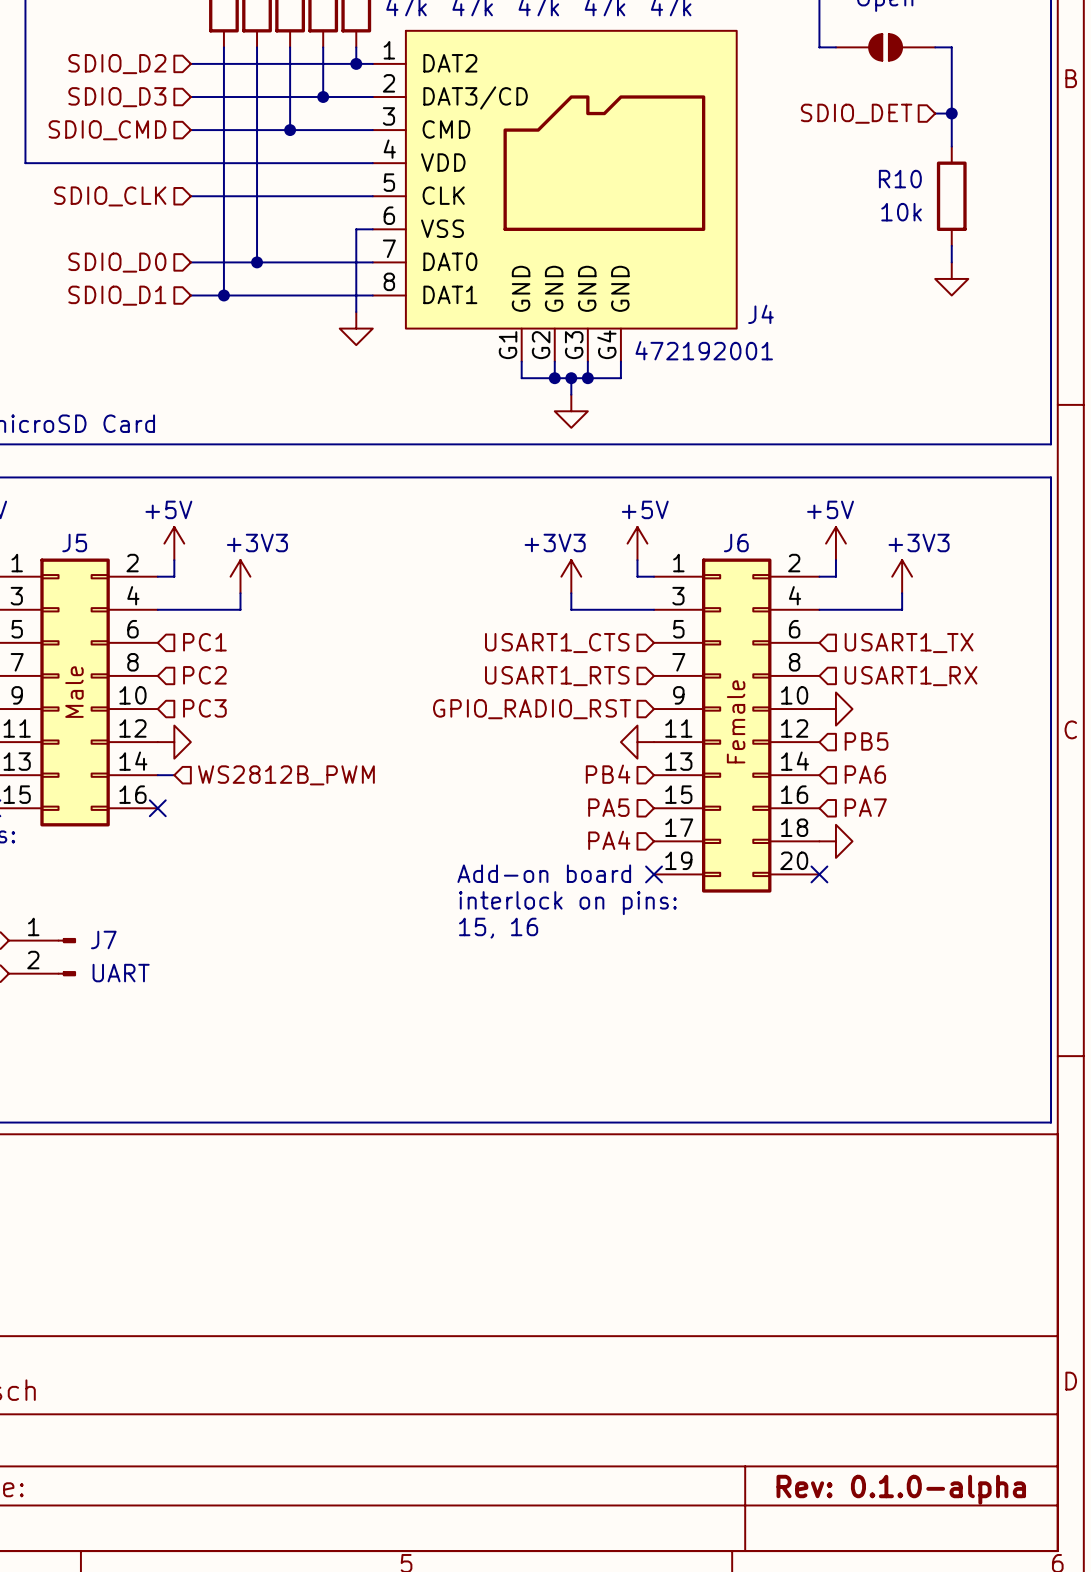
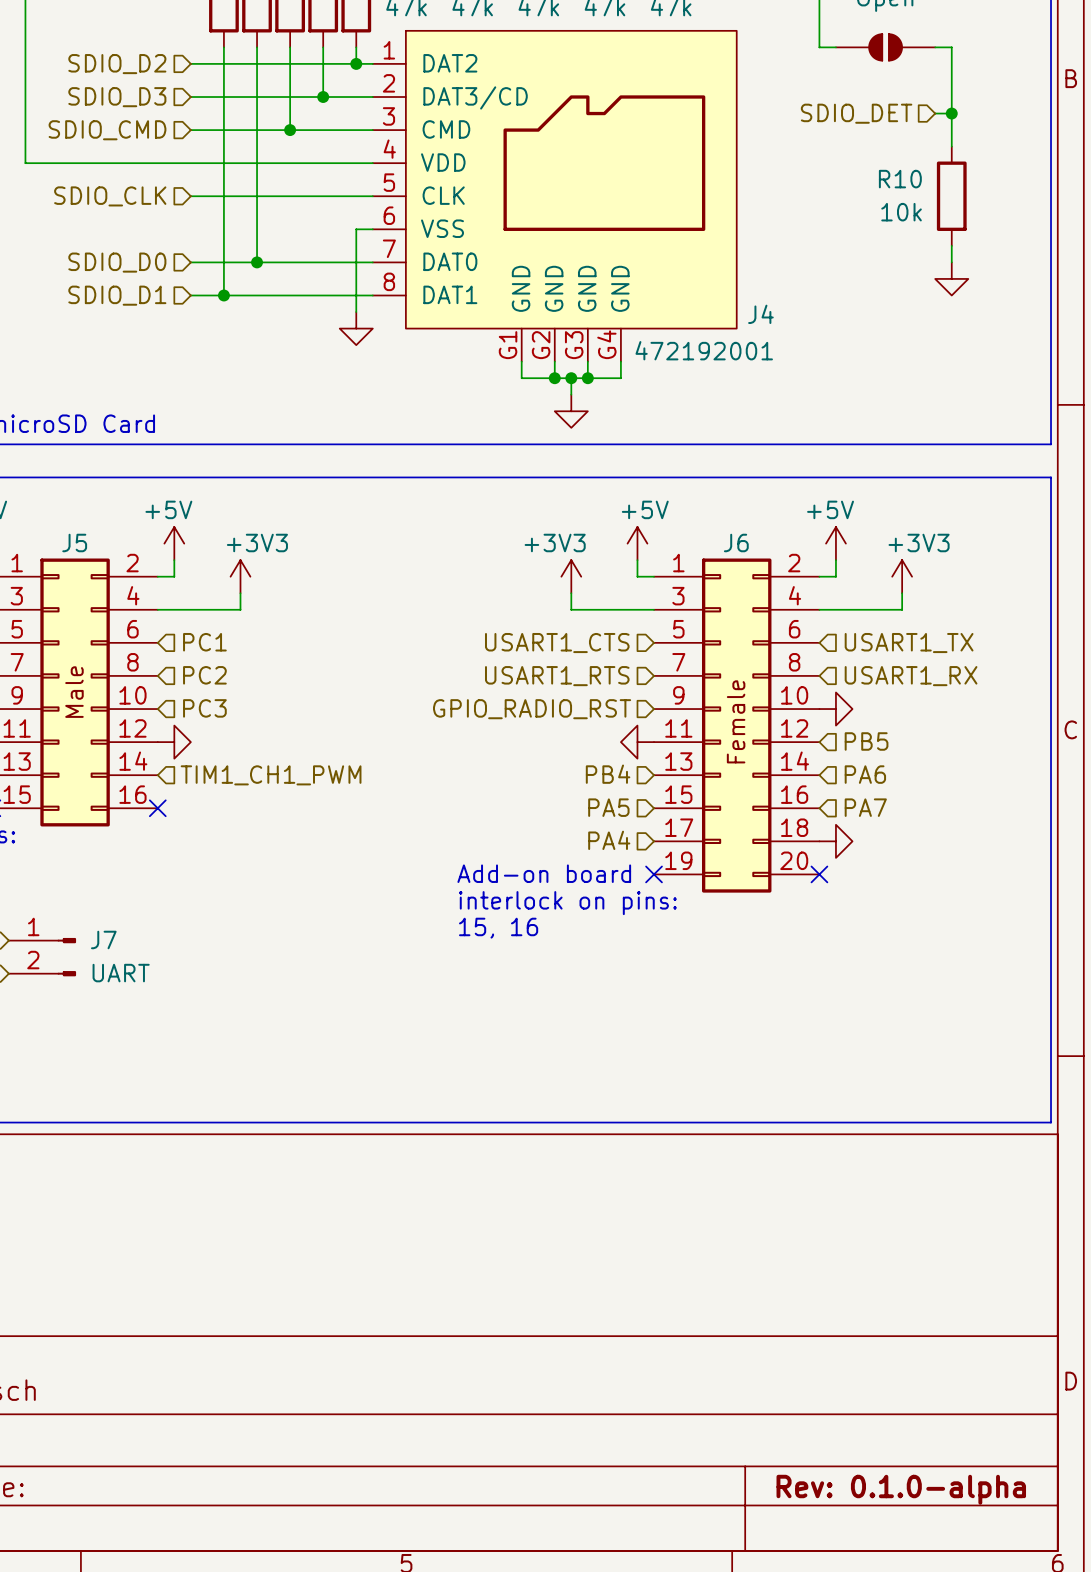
wire: (157, 775) (174, 775) -> none
hierarchical label: none -> TIM1_CH1_PWM (271, 775)
hierarchical label: WS2812B_PWM (286, 775) -> none

